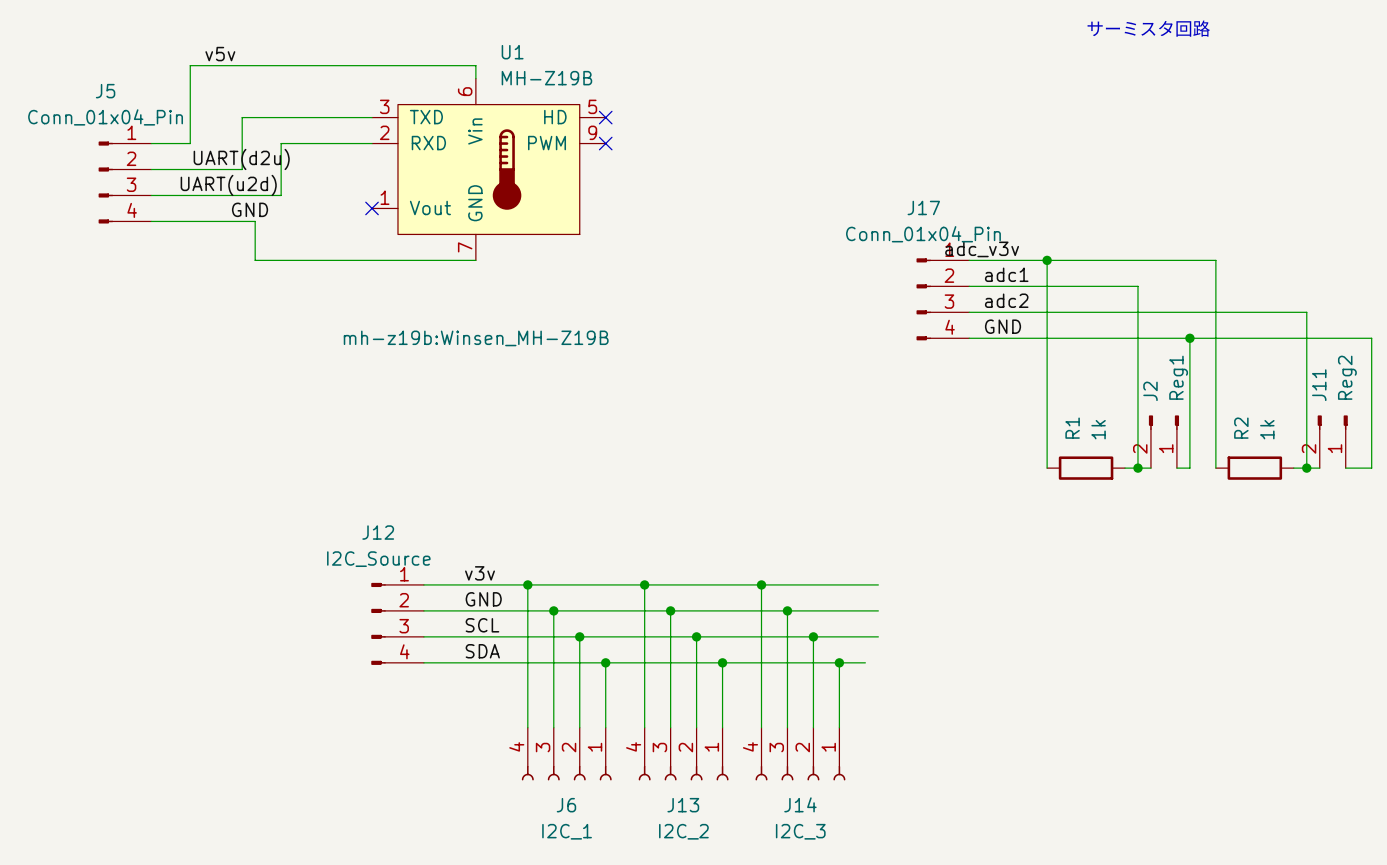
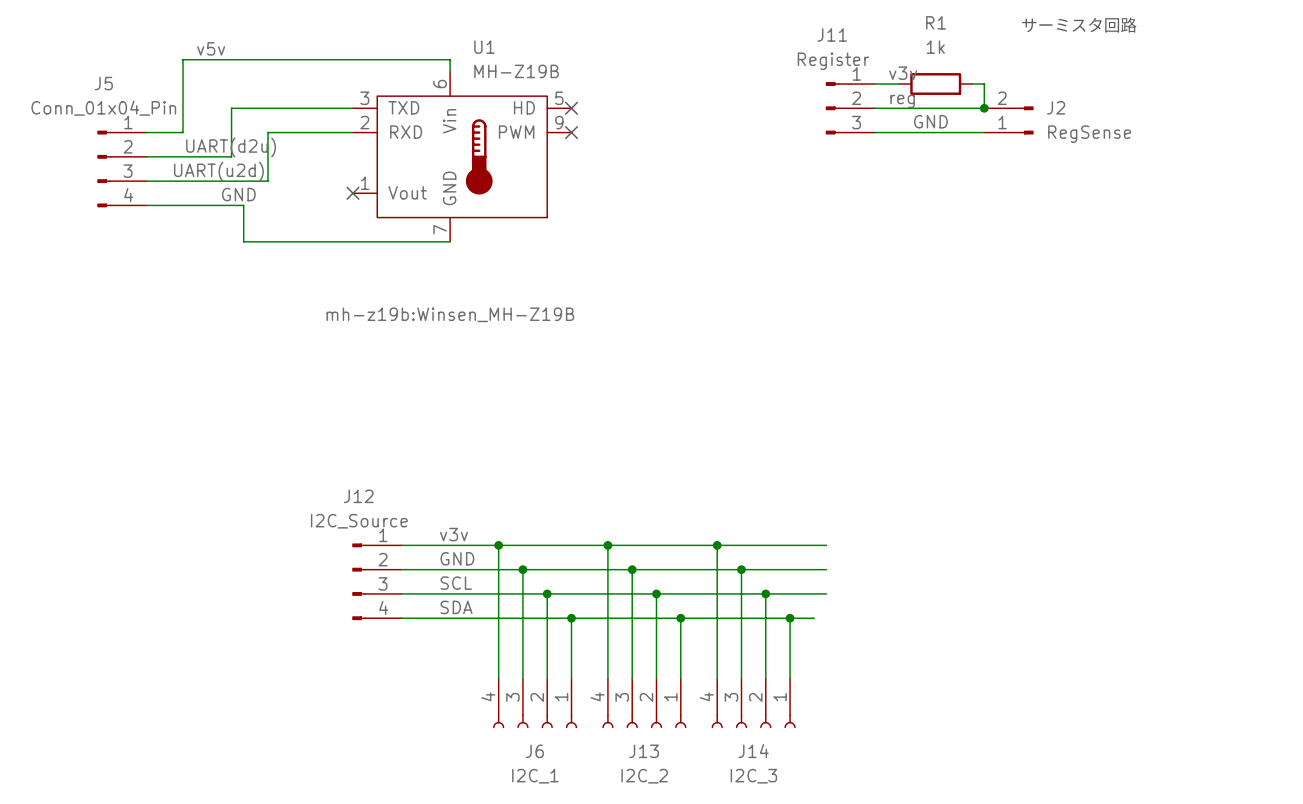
label: none -> v3v (903, 73)
wire: none -> (875, 84) (899, 84)
wire: none -> (972, 84) (984, 84) (984, 108) (875, 108)
label: none -> reg (902, 101)
junction: none -> (984, 108)
wire: none -> (875, 132) (984, 132)
label: adc_v3v (982, 249) -> none
wire: (969, 260) (1215, 260) (1215, 468) -> none
wire: (1047, 260) (1047, 468) -> none
junction: (1047, 260) -> none
label: adc1 (1006, 274) -> none
wire: (969, 286) (1137, 286) (1137, 468) -> none
J17: Conn_01x04_Pin (942, 299) -> none
label: adc2 (1006, 300) -> none
wire: (969, 312) (1306, 312) (1306, 468) -> none
label position: GND (1003, 326) -> GND (930, 121)
wire: (969, 338) (1371, 338) (1371, 468) (1345, 468) -> none
wire: (1189, 338) (1189, 468) (1176, 468) -> none
junction: (1189, 338) -> none
J2 value: Reg1 (1178, 377) -> RegSense (1089, 134)
J11 value: Reg2 (1347, 377) -> Register (833, 61)
J11 symbol: [1317, 415, 1348, 469] -> [825, 82, 876, 135]
J2 rotation: 0° (1163, 422) -> 90° clockwise (1026, 120)
R1 name rotation: 0° (1072, 428) -> 90° clockwise (936, 22)
R1 value rotation: 0° (1098, 429) -> 90° clockwise (935, 47)
J2 position: (1163, 441) -> (1008, 120)
R1 position: (1086, 468) -> (935, 84)
wire: (1125, 468) (1150, 468) -> none
junction: (1137, 468) -> none
R2: 1k (1254, 468) -> none
wire: (1293, 468) (1319, 468) -> none
junction: (1306, 468) -> none

